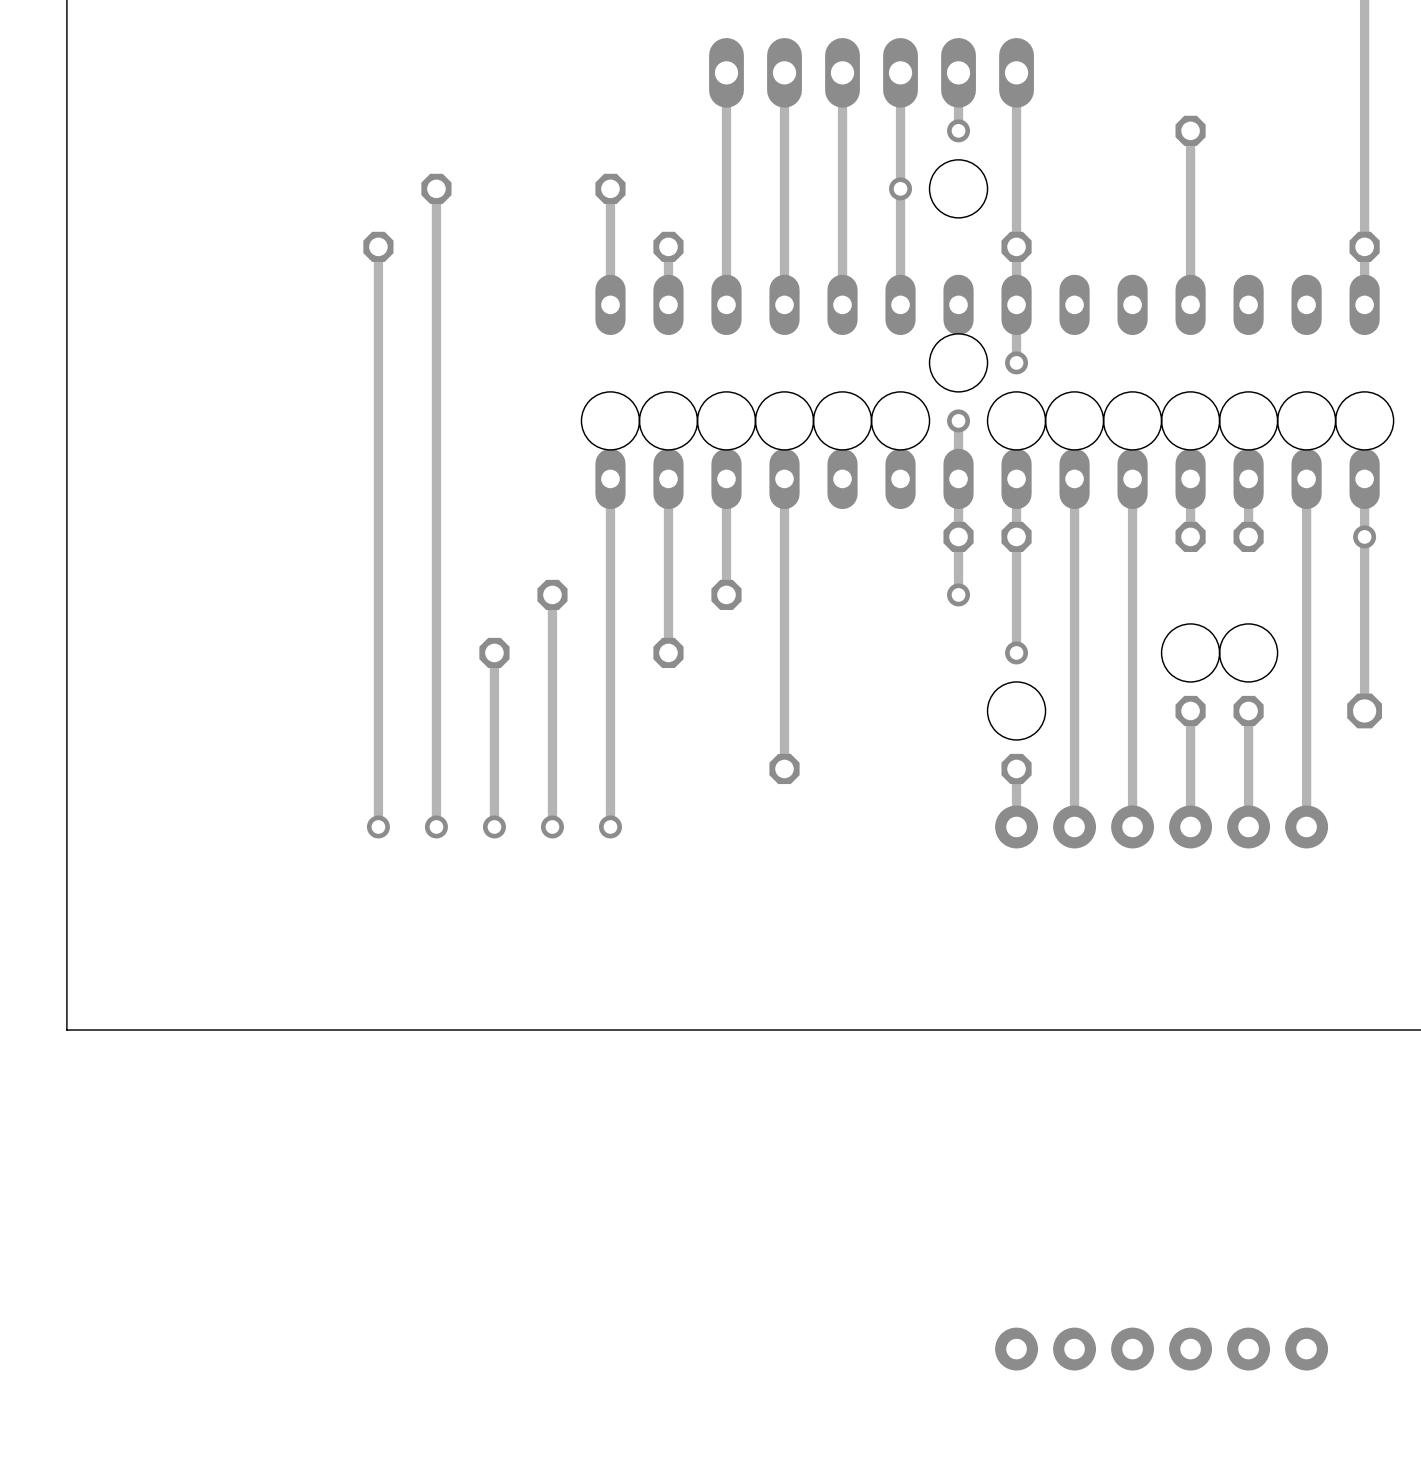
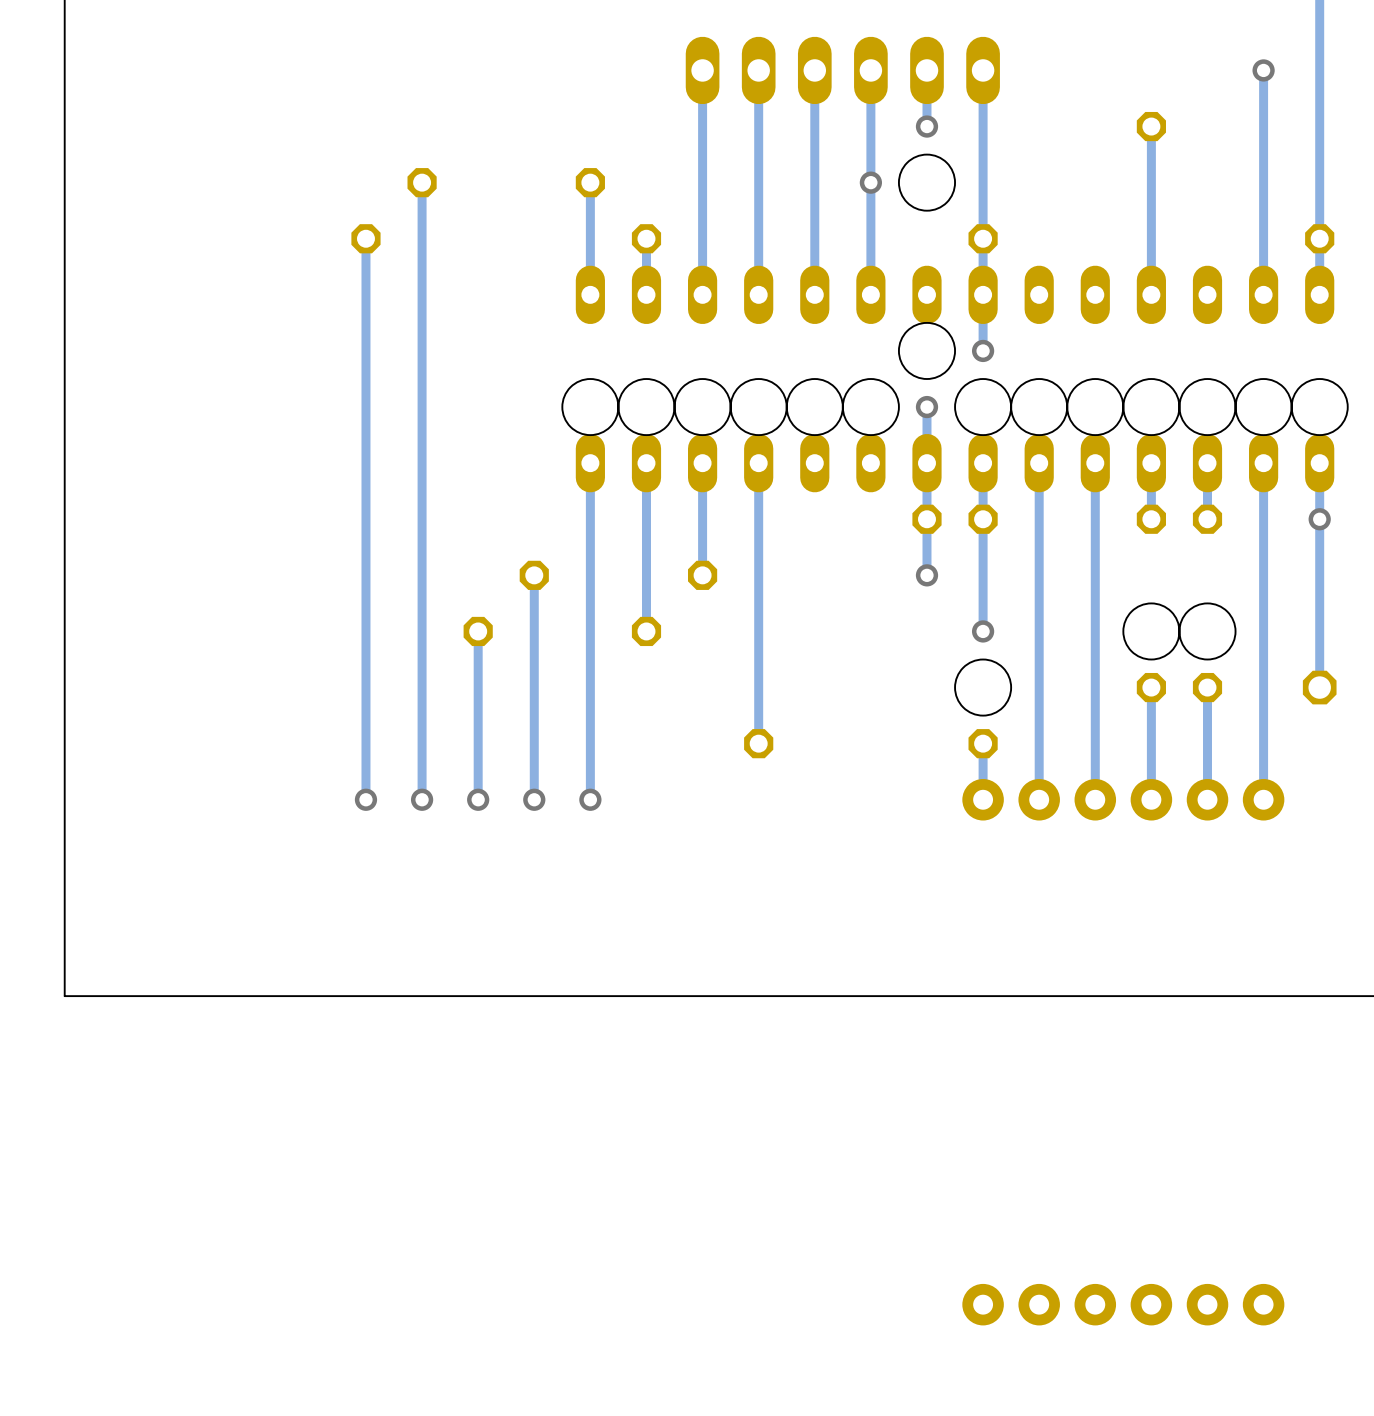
track: none -> (1263, 70) (1263, 294)
via: none -> (1263, 70)

